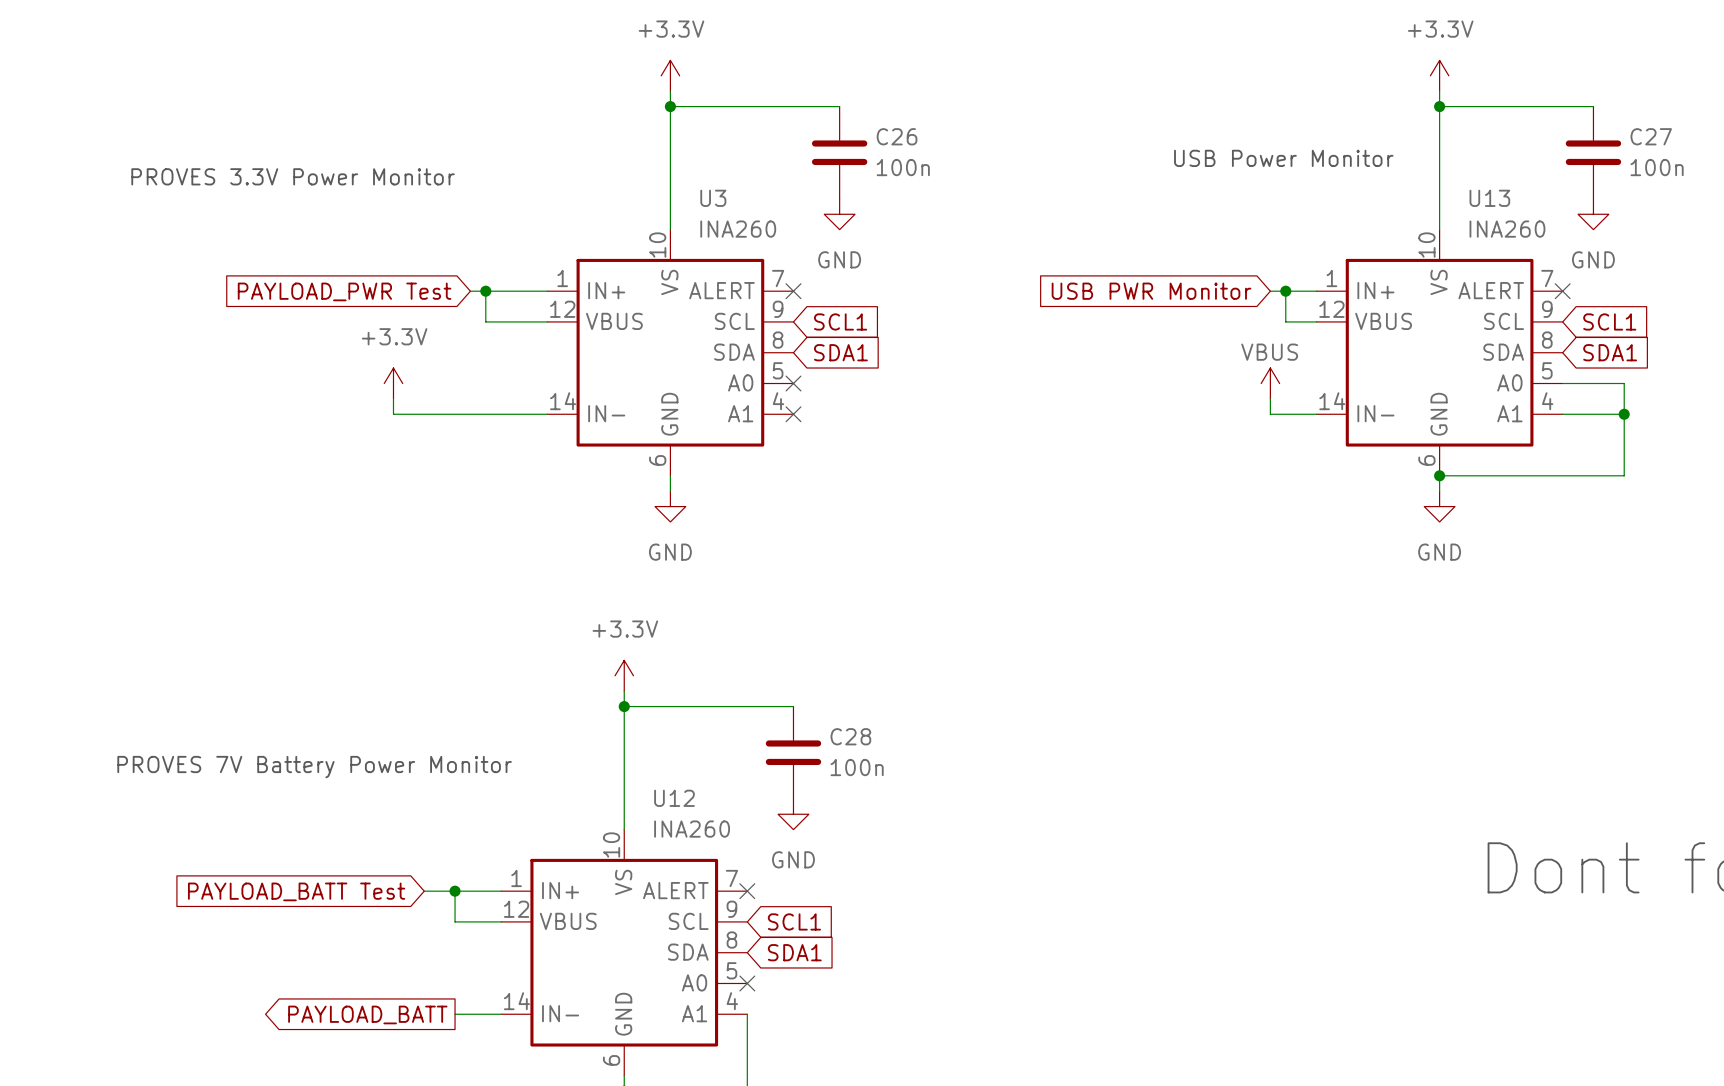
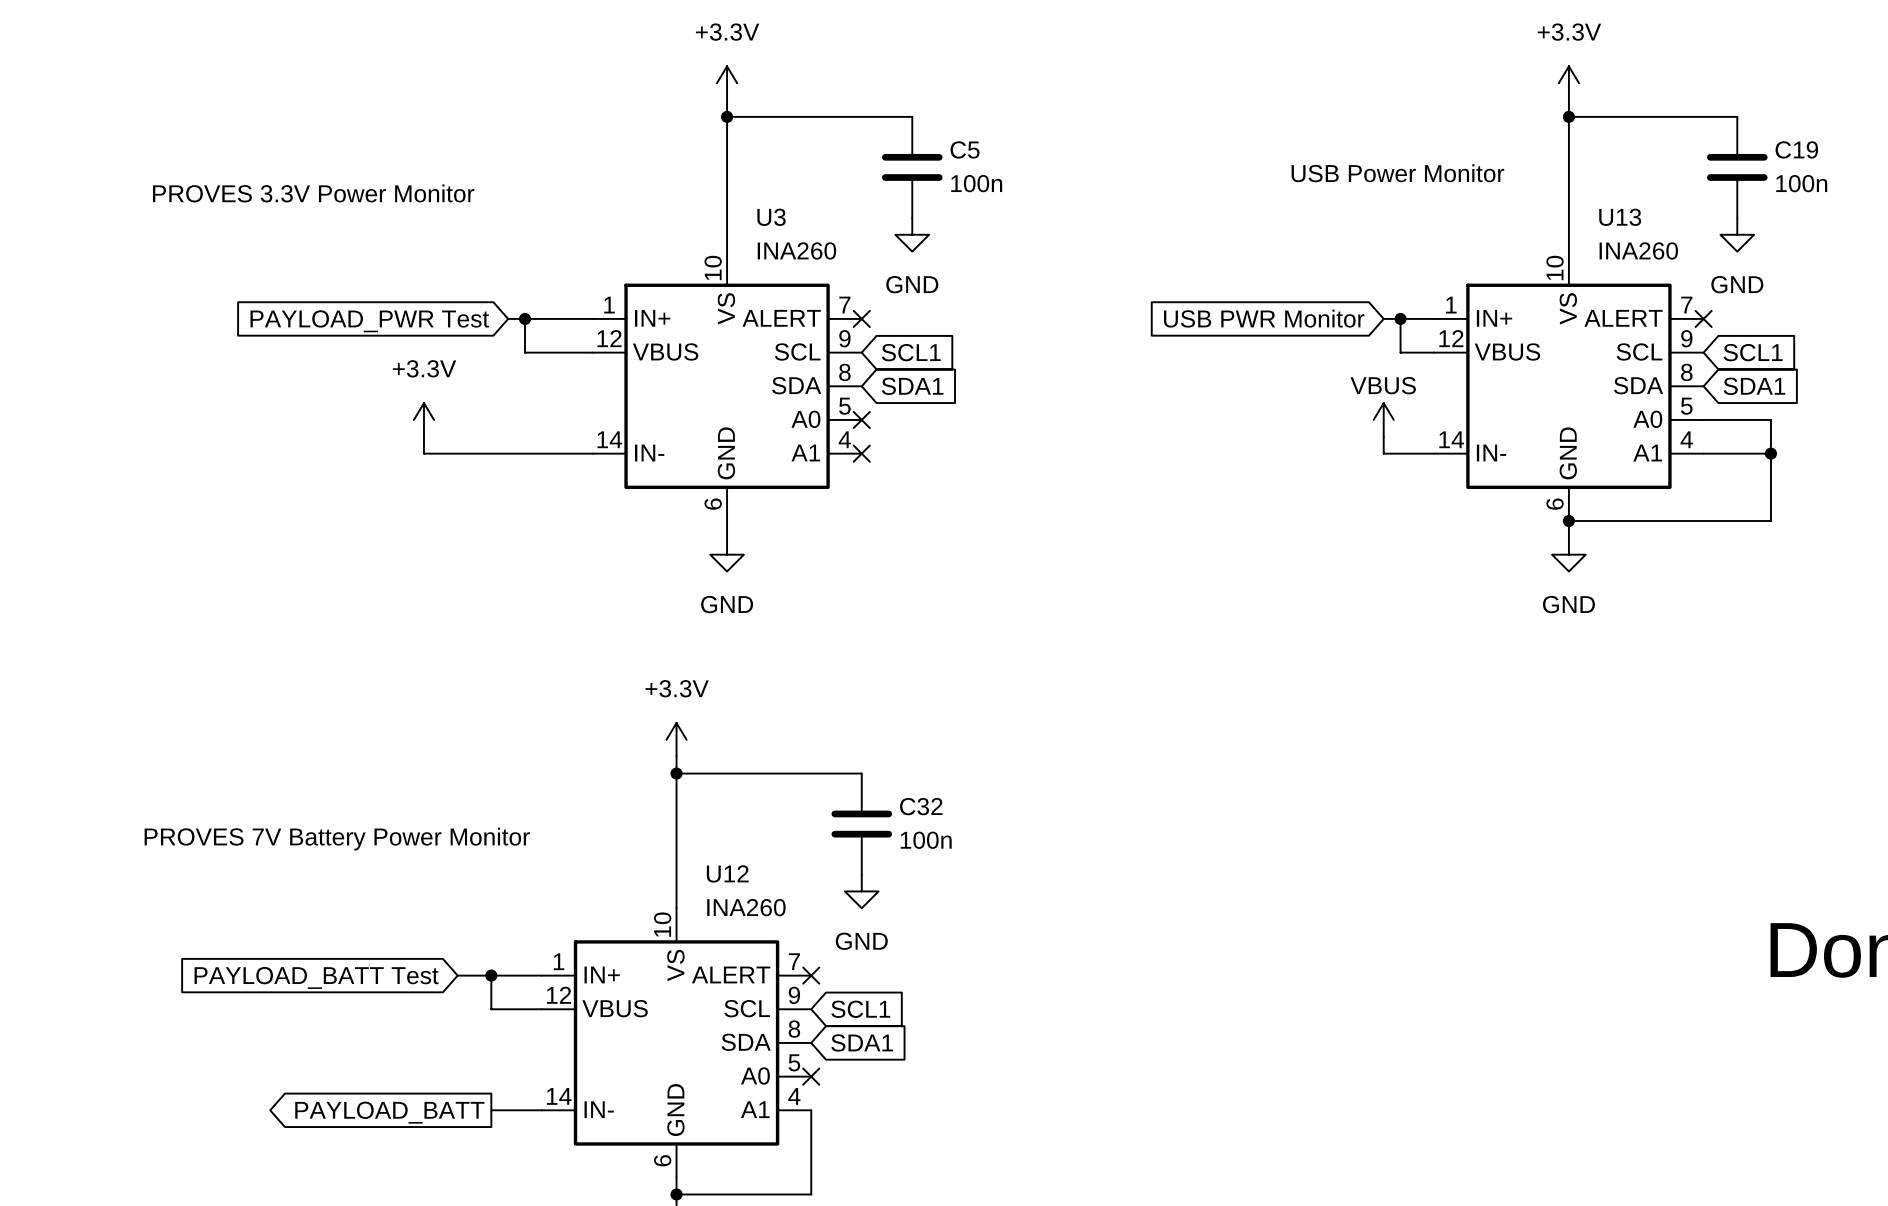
C26 name: C26 (897, 136) -> C5 (965, 149)
C27 name: C27 (1651, 136) -> C19 (1796, 149)
C28 name: C28 (850, 736) -> C32 (921, 806)

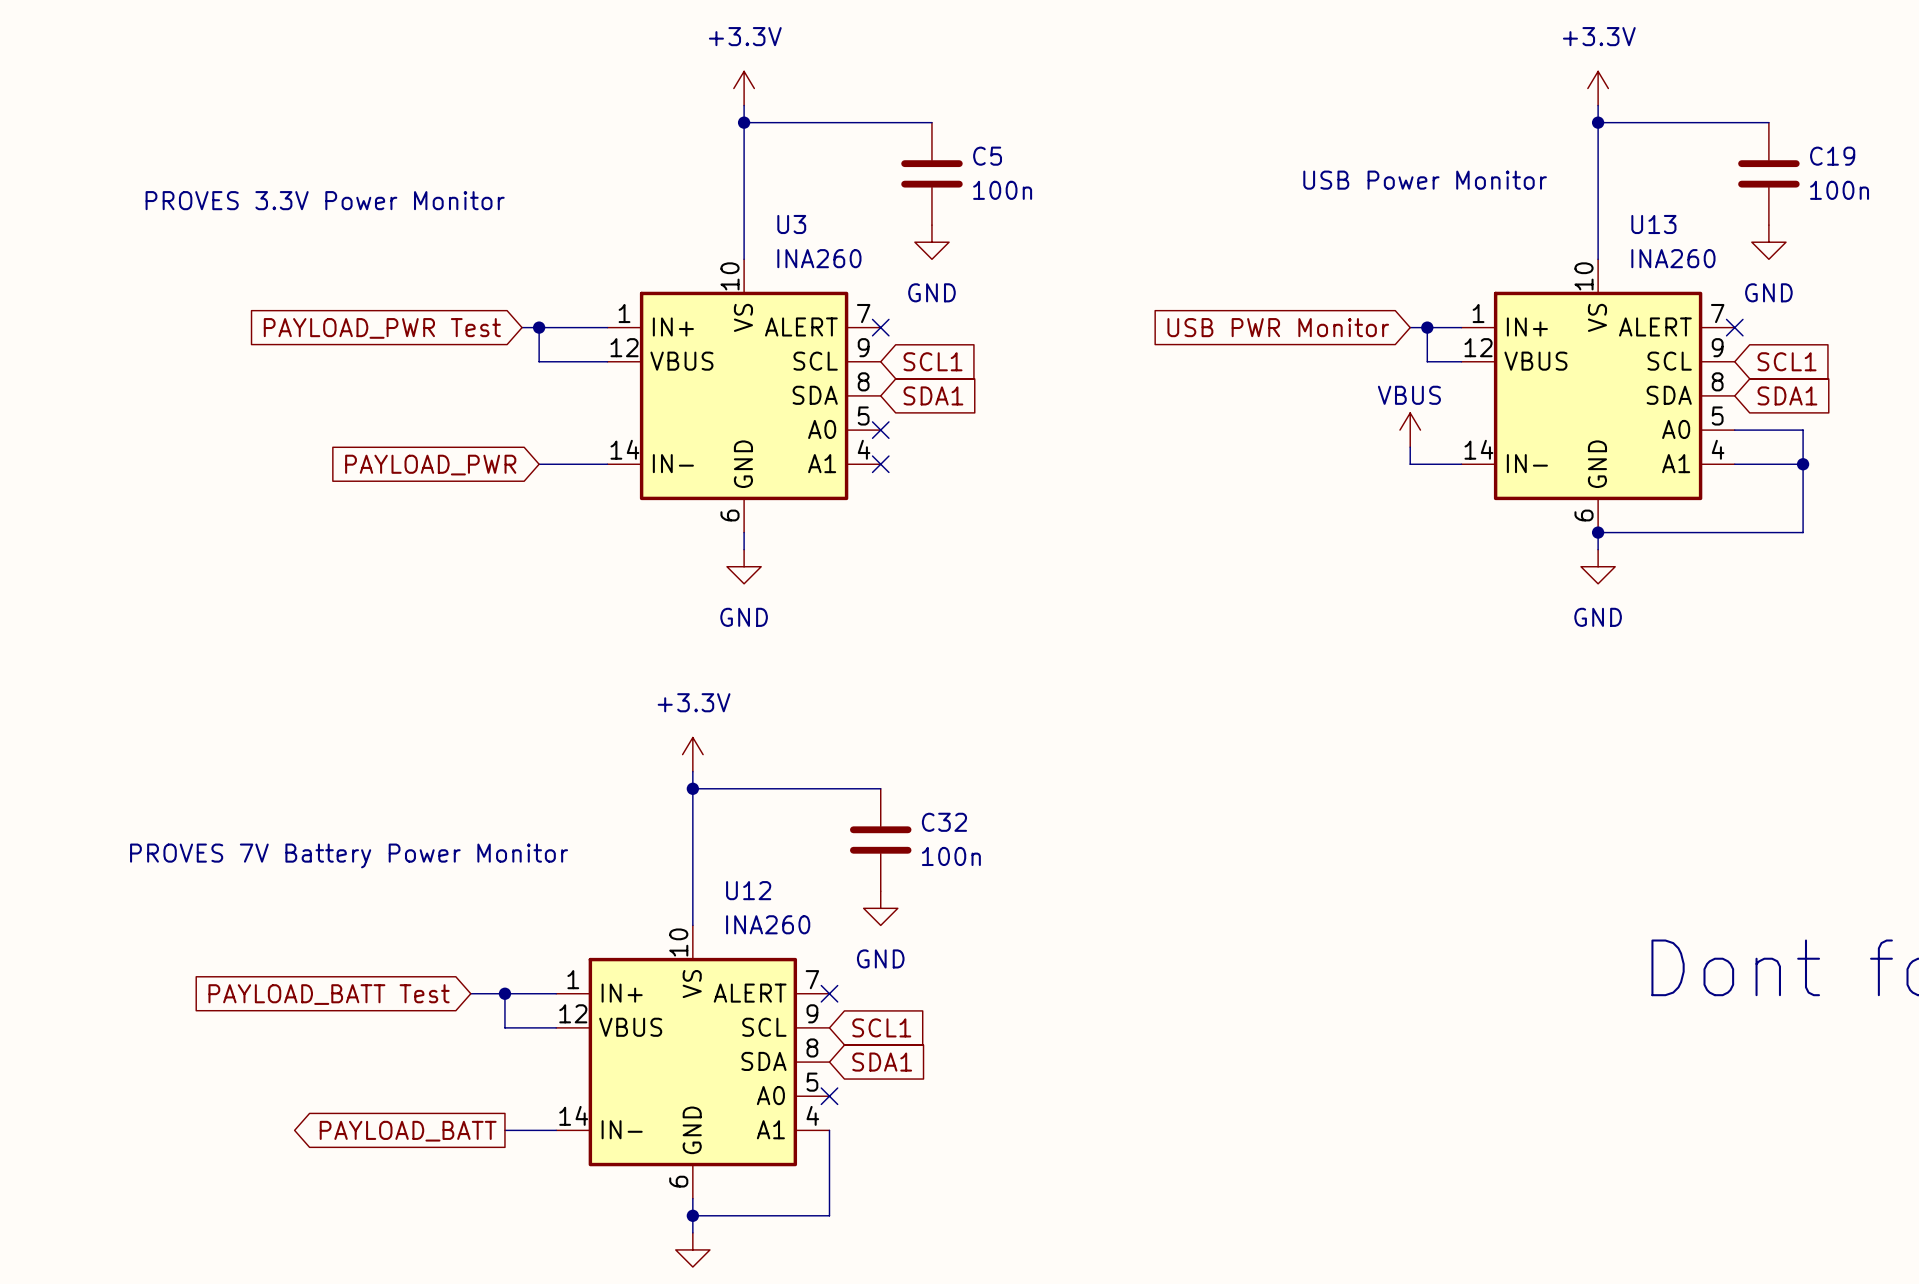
power symbol: +3.3V (423, 419) -> none
wire: (423, 436) (423, 453) (525, 453) -> none
global label: none -> PAYLOAD_PWR (430, 465)

